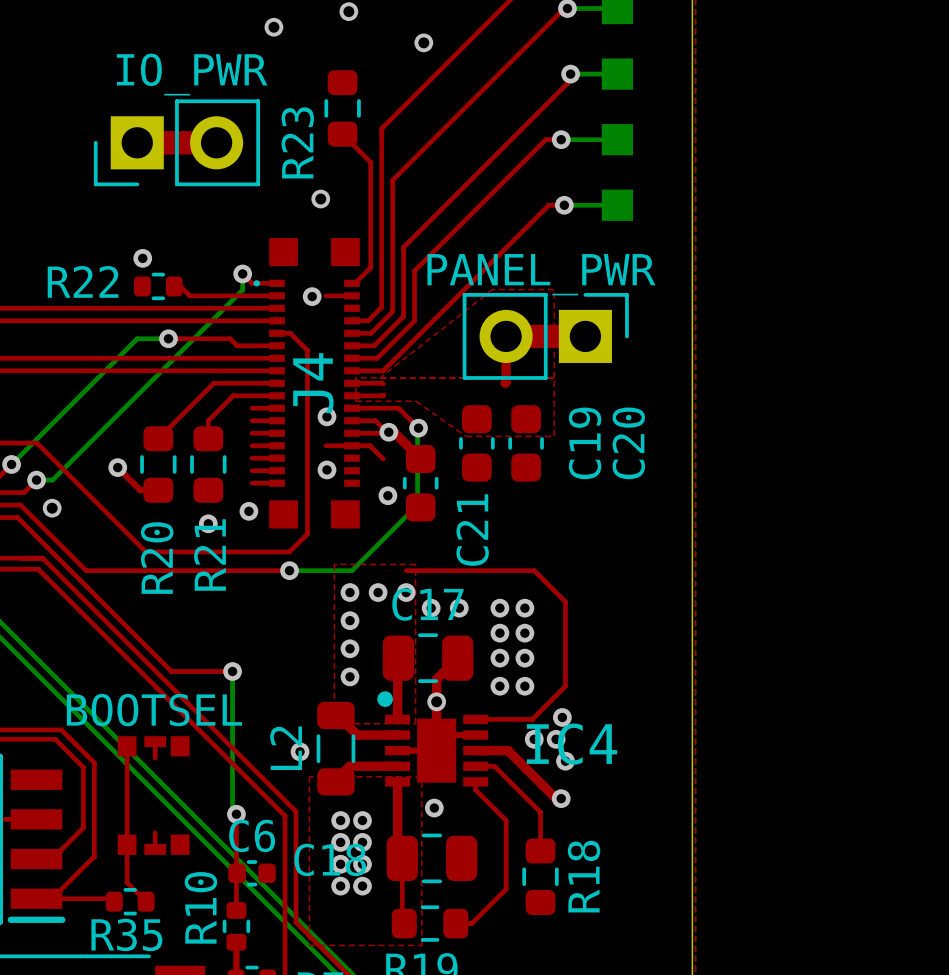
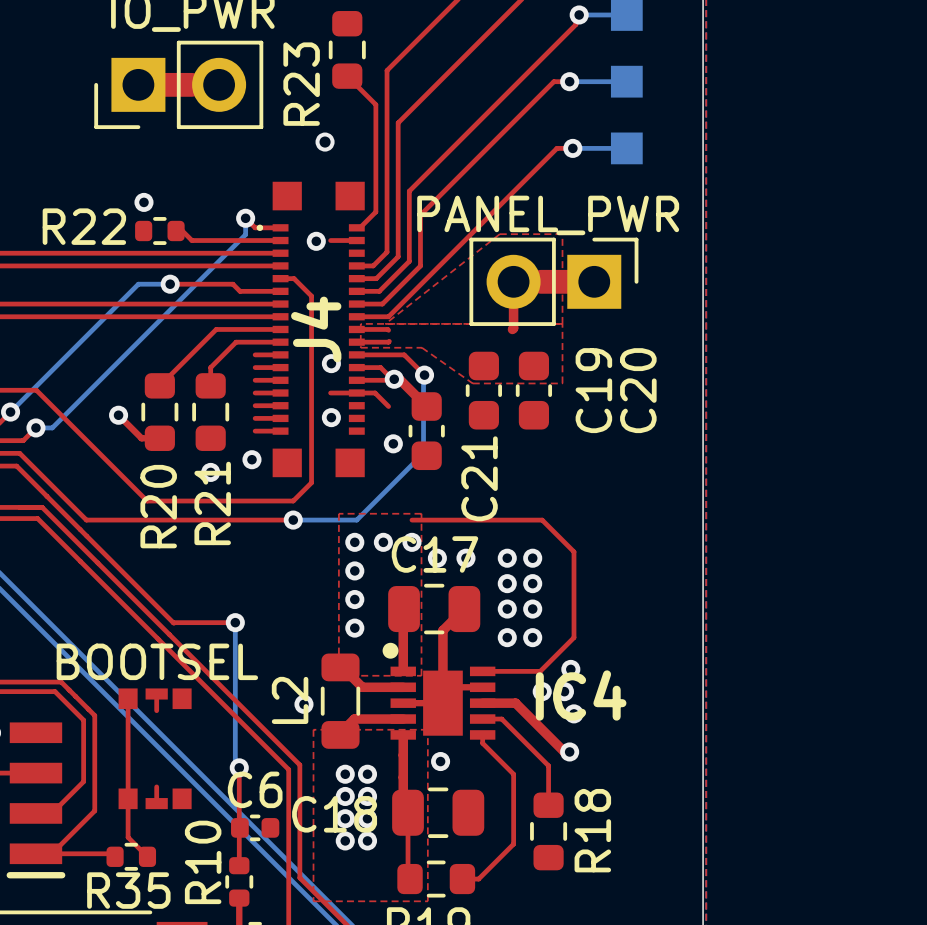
via: (52, 508) -> none
via: (436, 701) -> none

